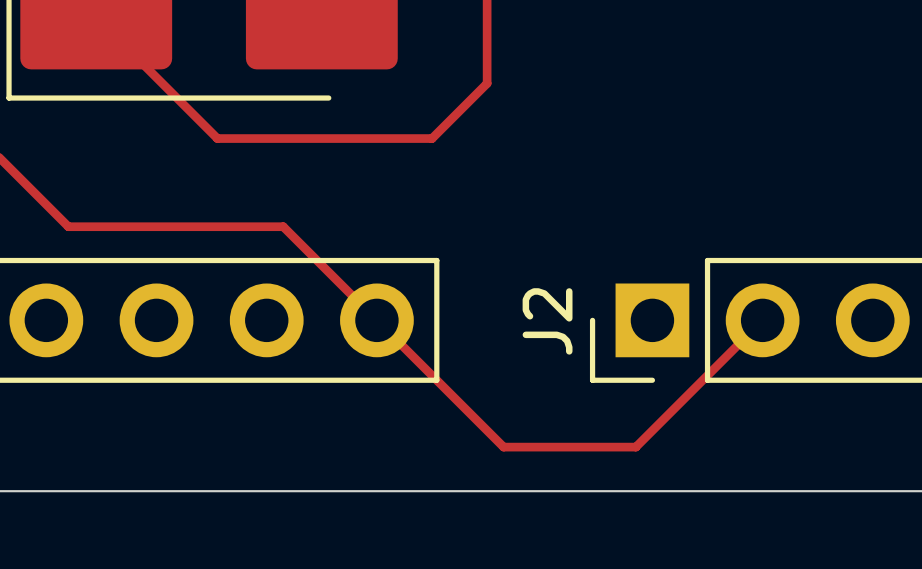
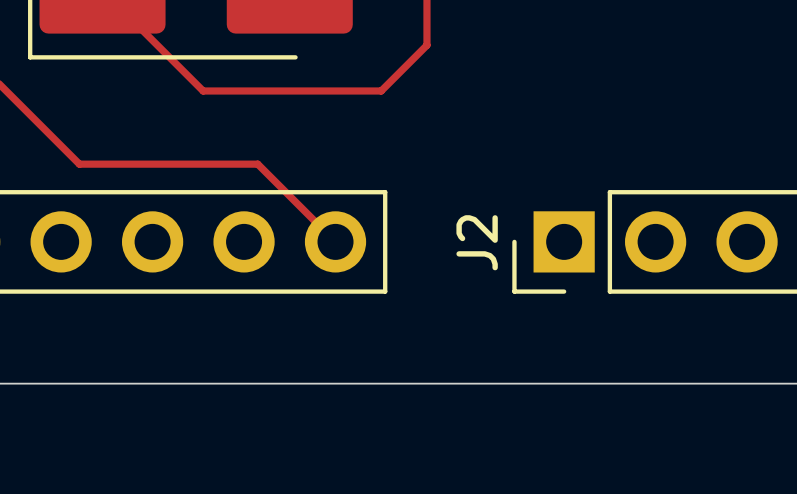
track: (376, 320) (503, 447) (635, 447) (762, 320) -> none

